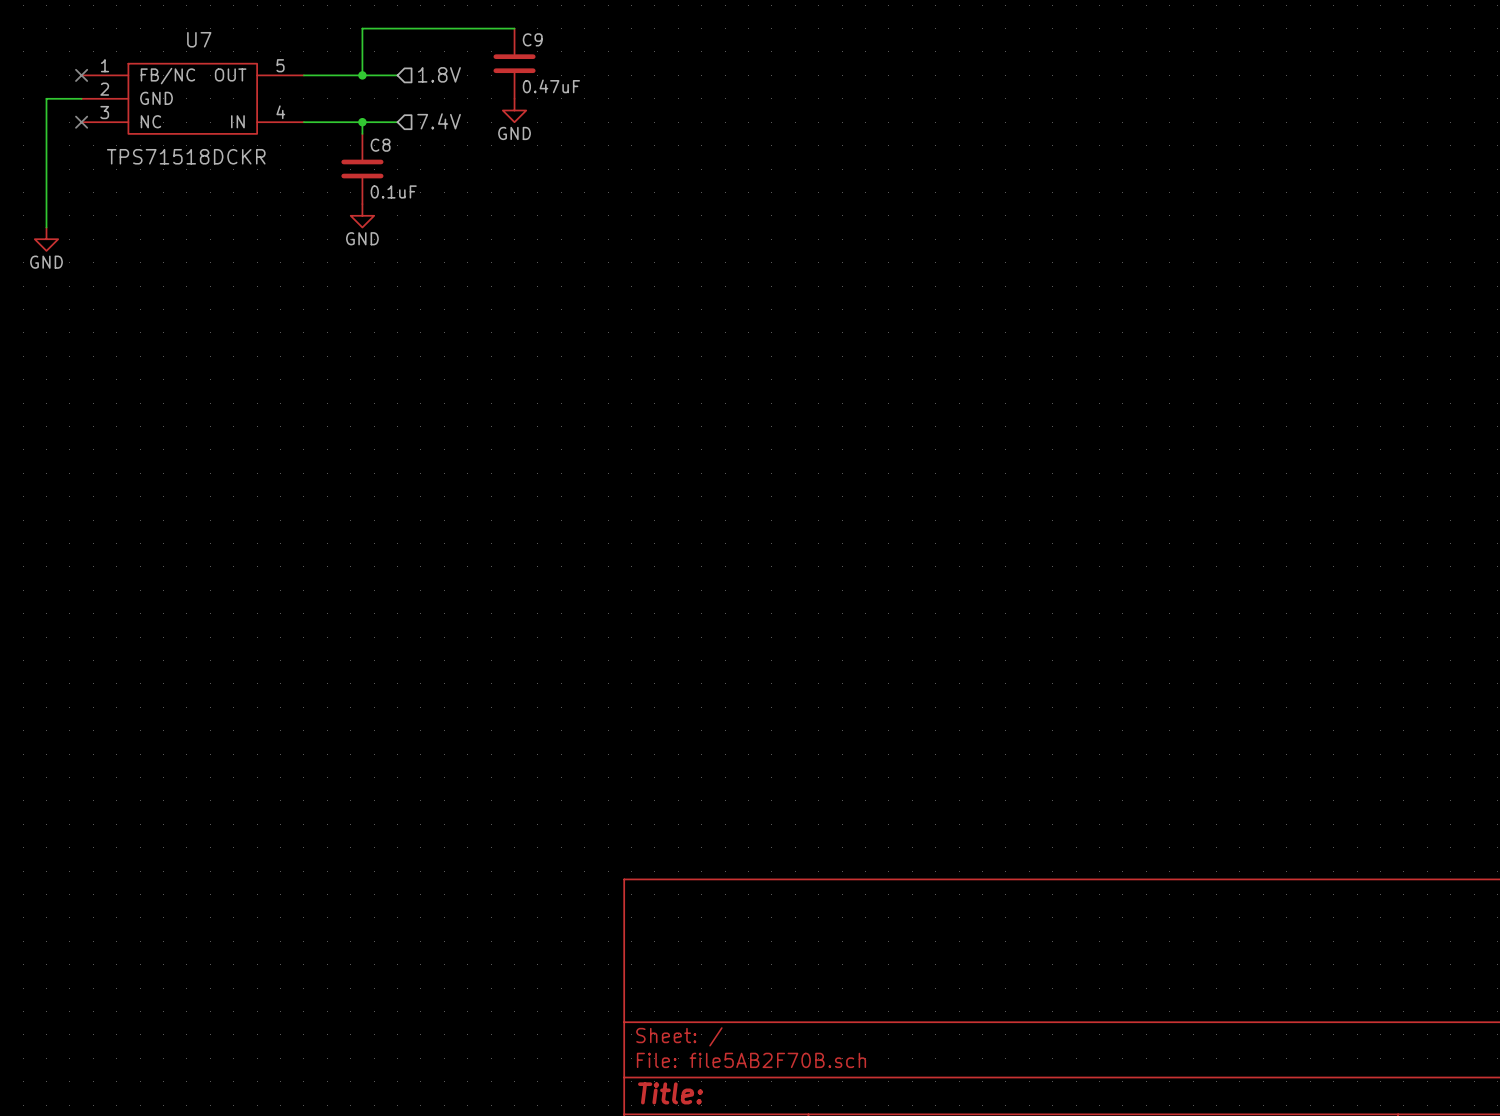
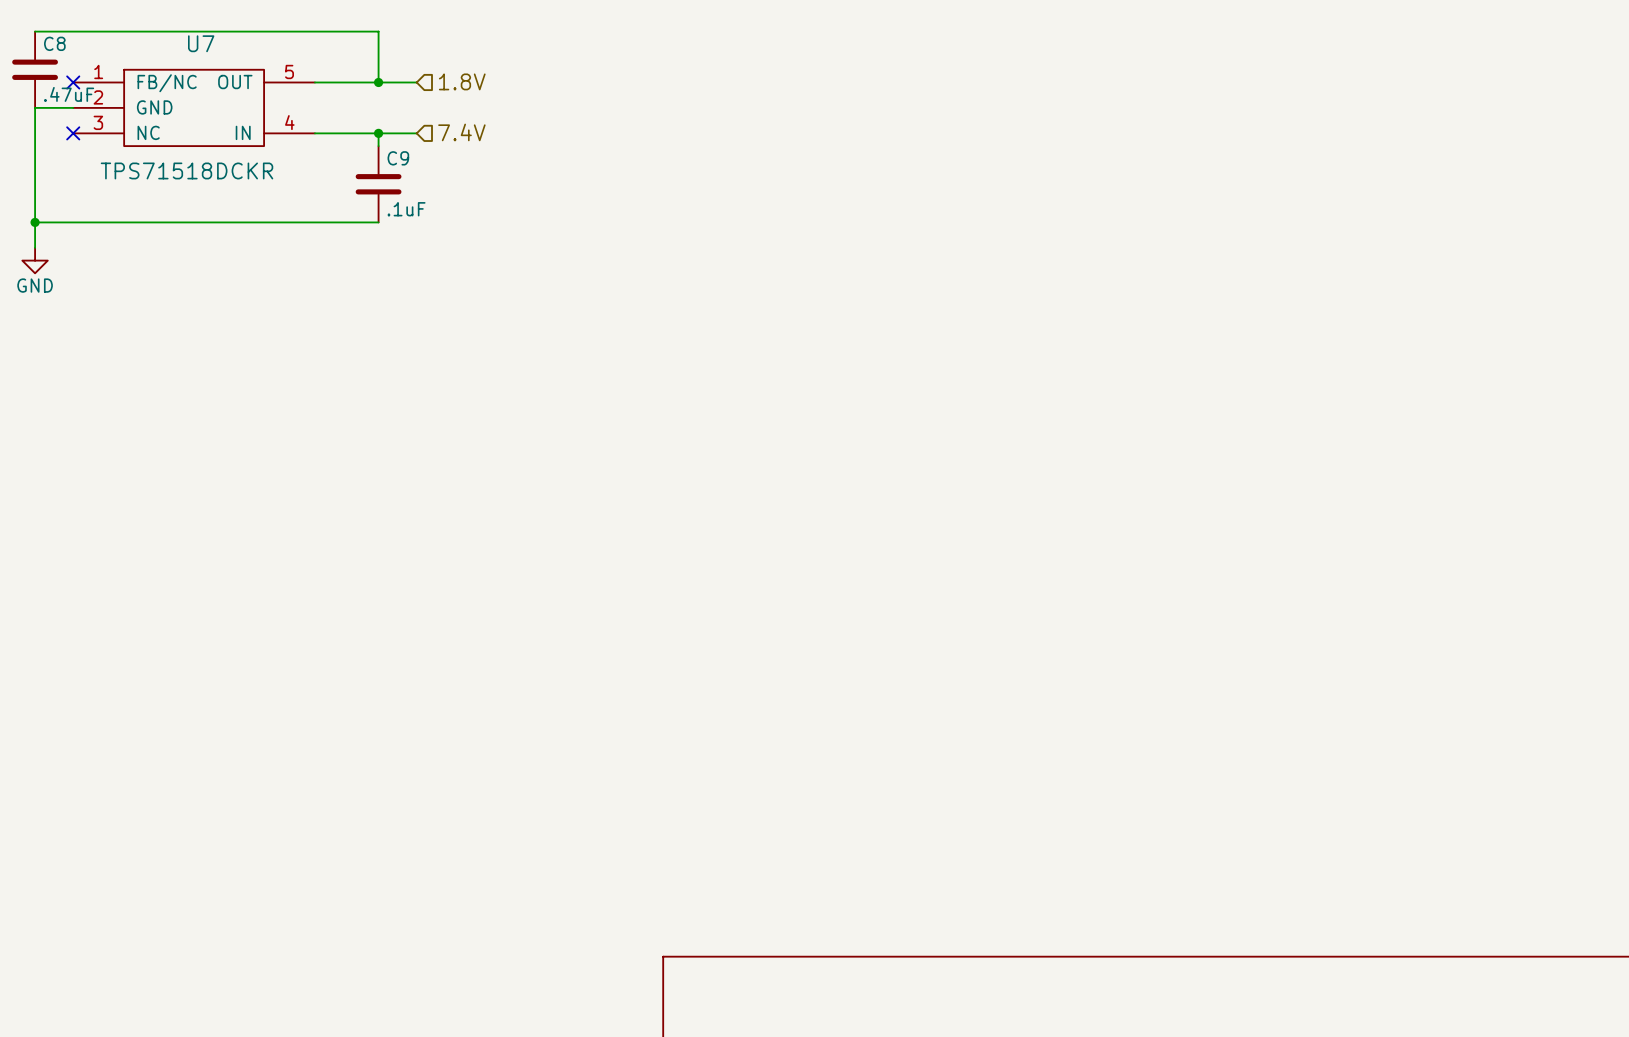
wire: (362, 28) (514, 28) -> (378, 31) (35, 31)
C8: none -> .47uF (35, 69)
C9: 0.47uF (514, 63) -> none
power symbol: GND (514, 110) -> none
C8 name: C8 (380, 145) -> C9 (398, 158)
C8 value: 0.1uF (393, 191) -> .1uF (406, 209)
wire: none -> (35, 222) (378, 222)
junction: none -> (35, 222)
power symbol: GND (362, 215) -> none

